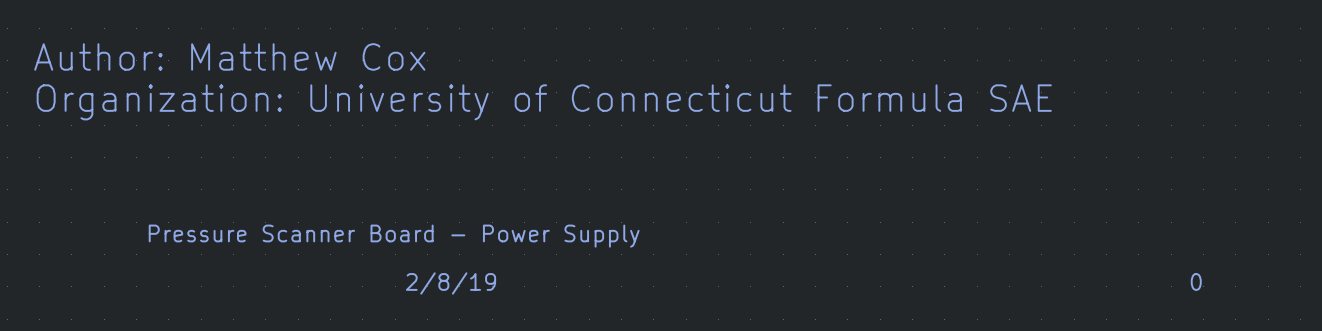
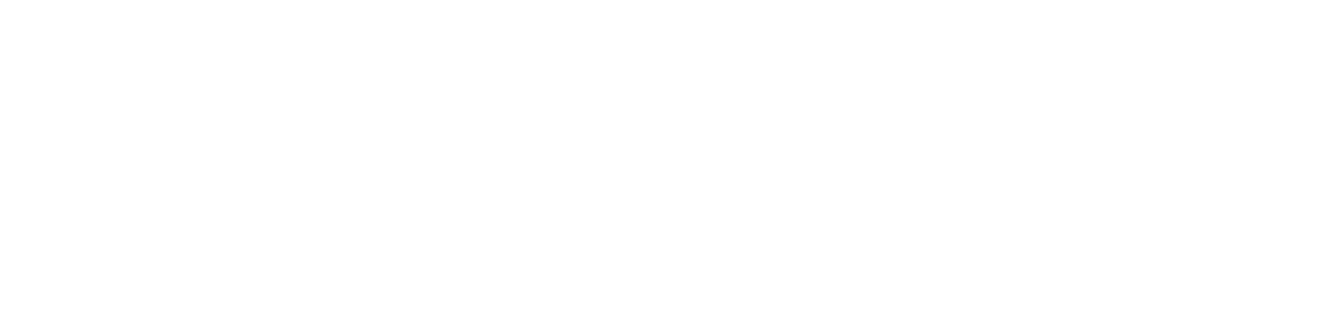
text: Author: Matthew Cox (229, 56) -> none
text: Organization: University of Connecticut Formula SAE (544, 102) -> none
text: Pressure Scanner Board - Power Supply (394, 236) -> none
text: 0 (1196, 281) -> none
text: 2/8/19 (451, 283) -> none

